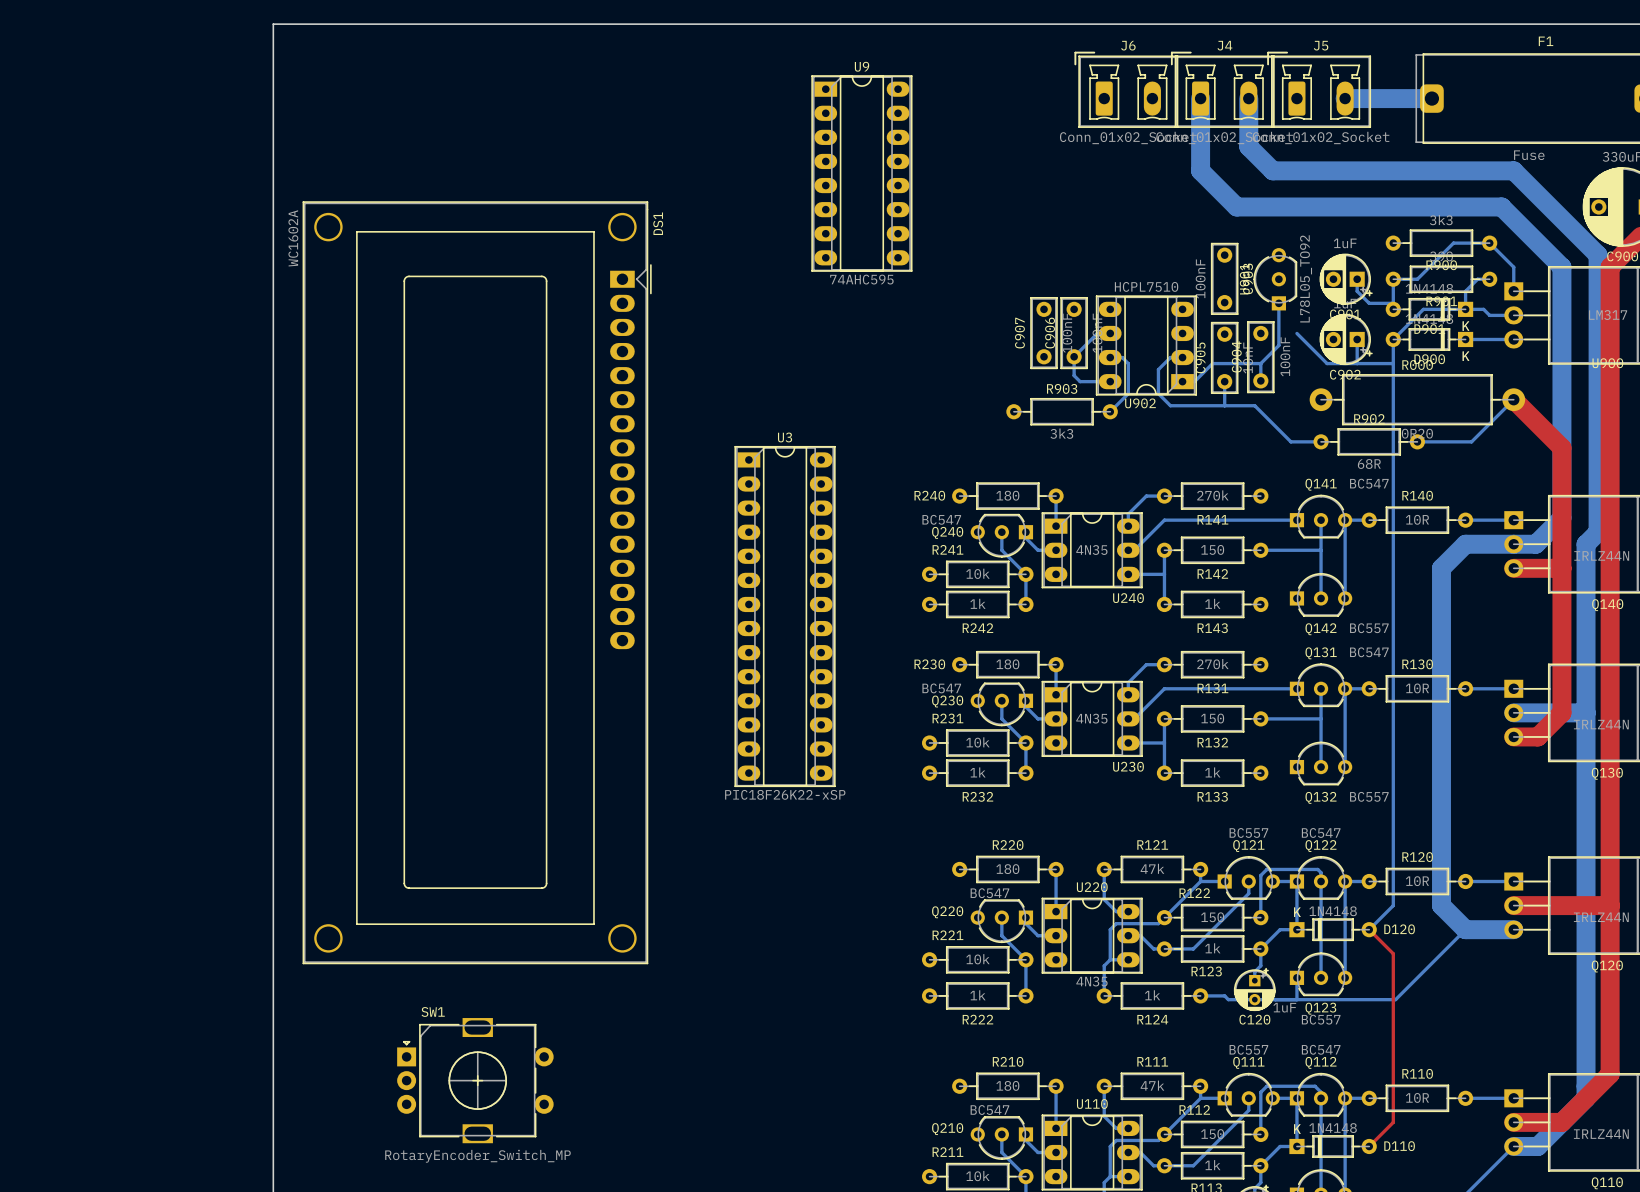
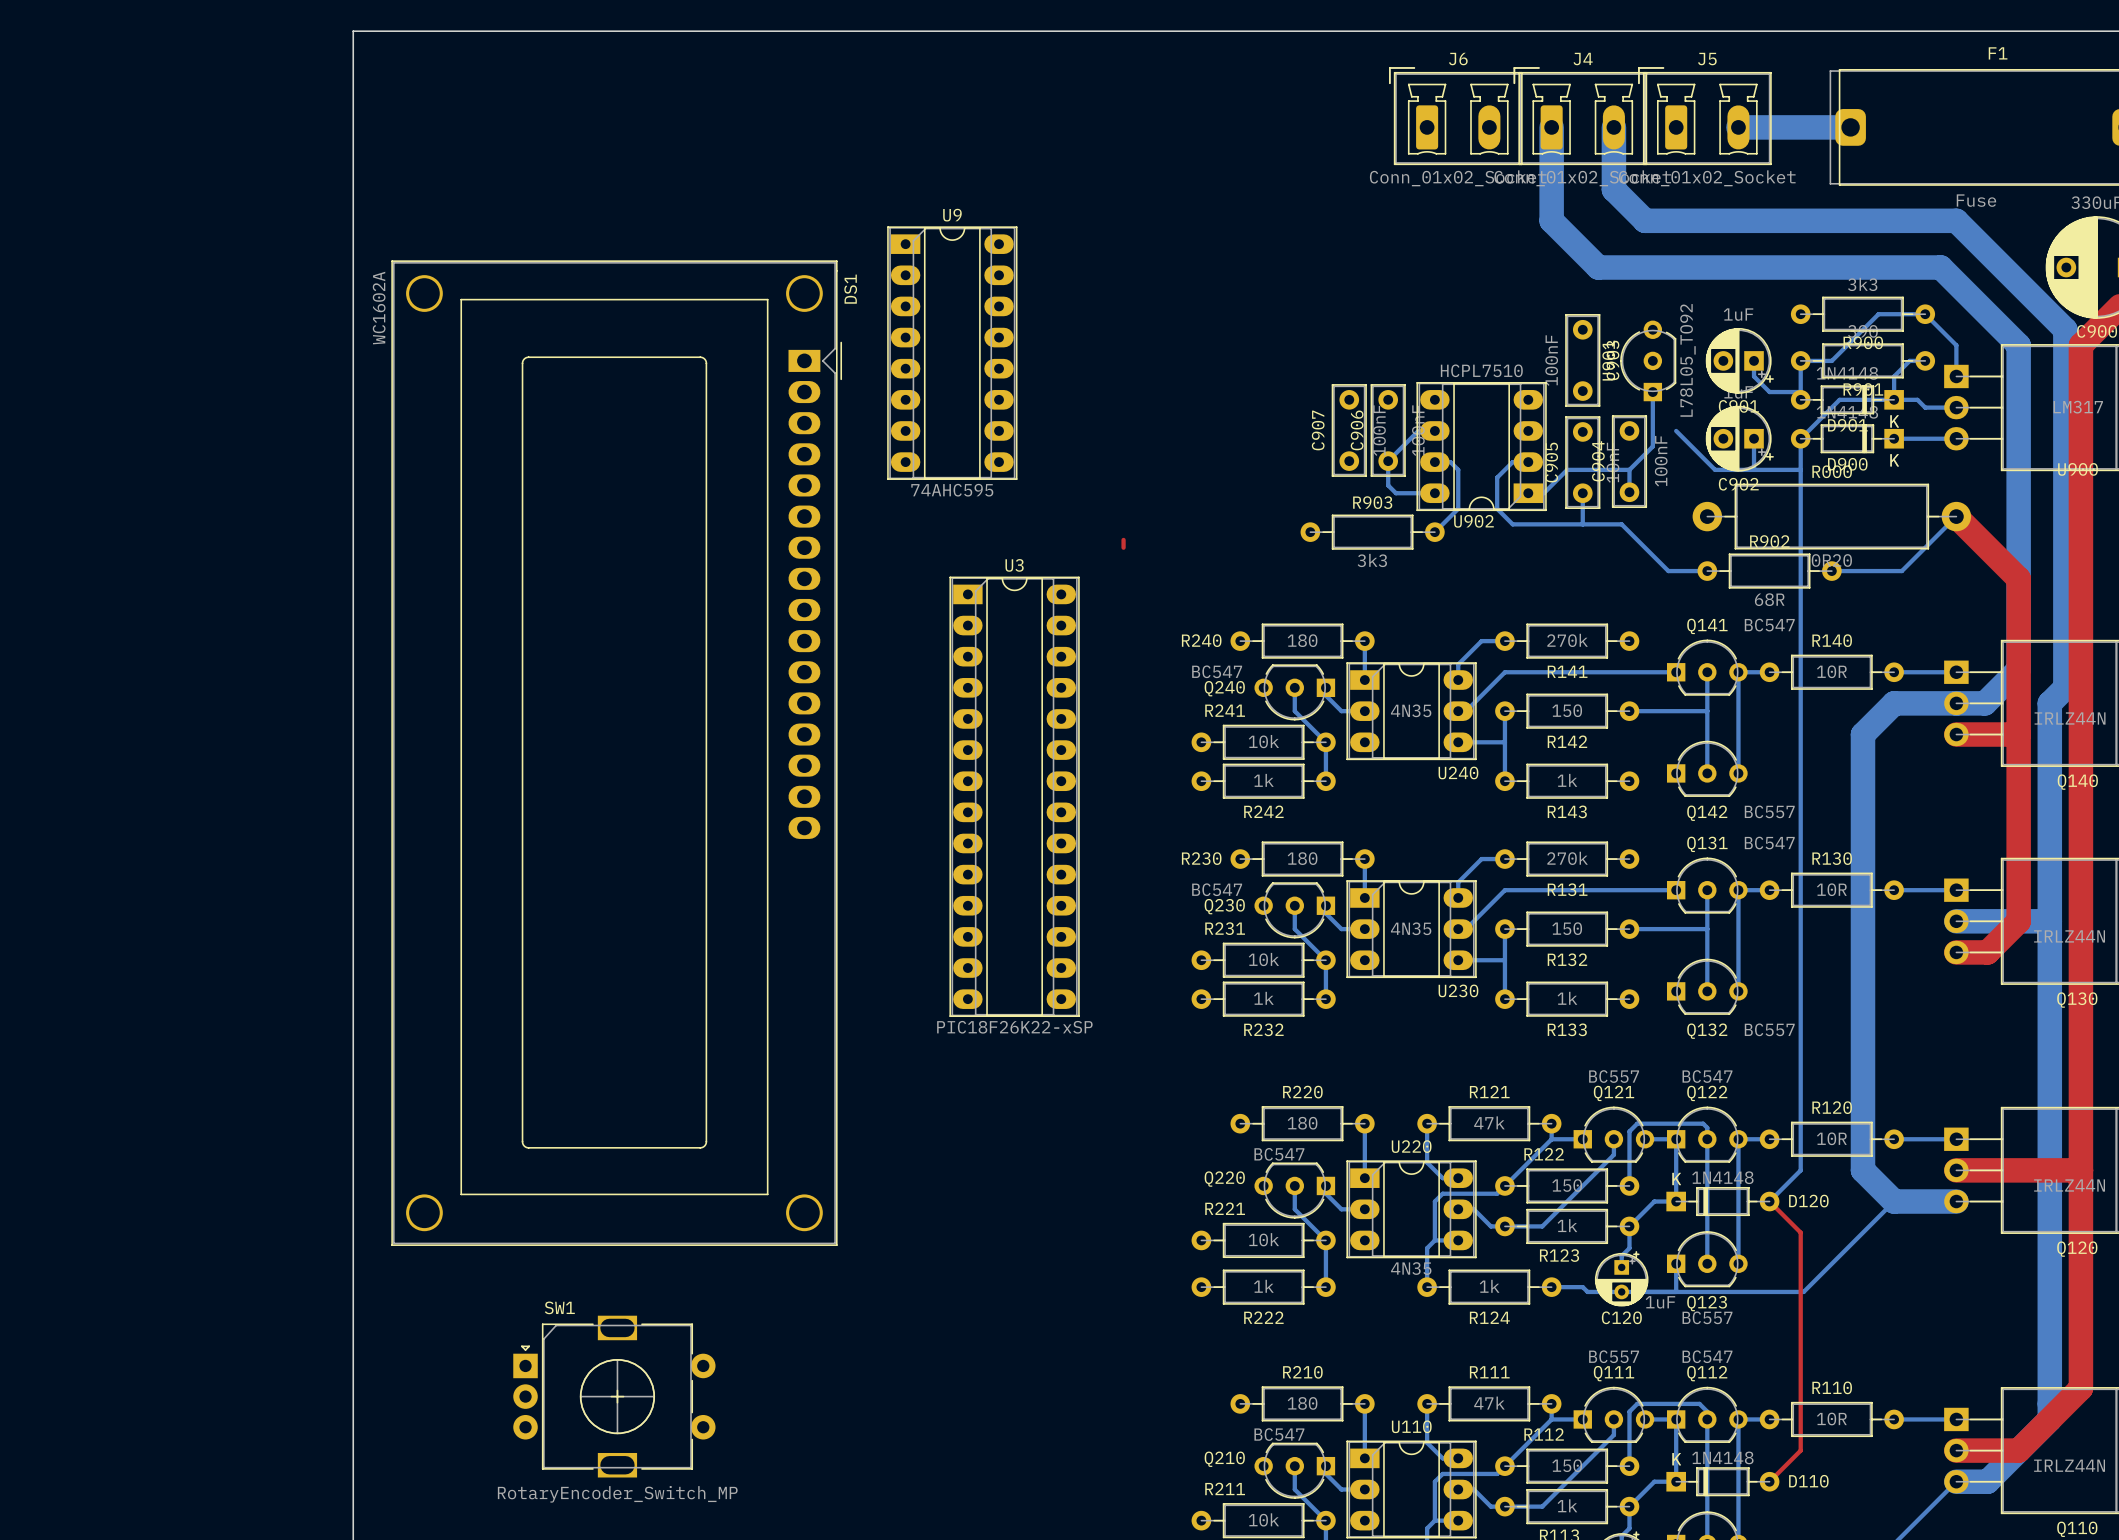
U9 position: (861, 173) -> (952, 353)
top track: none -> (1123, 539) (1123, 547)

